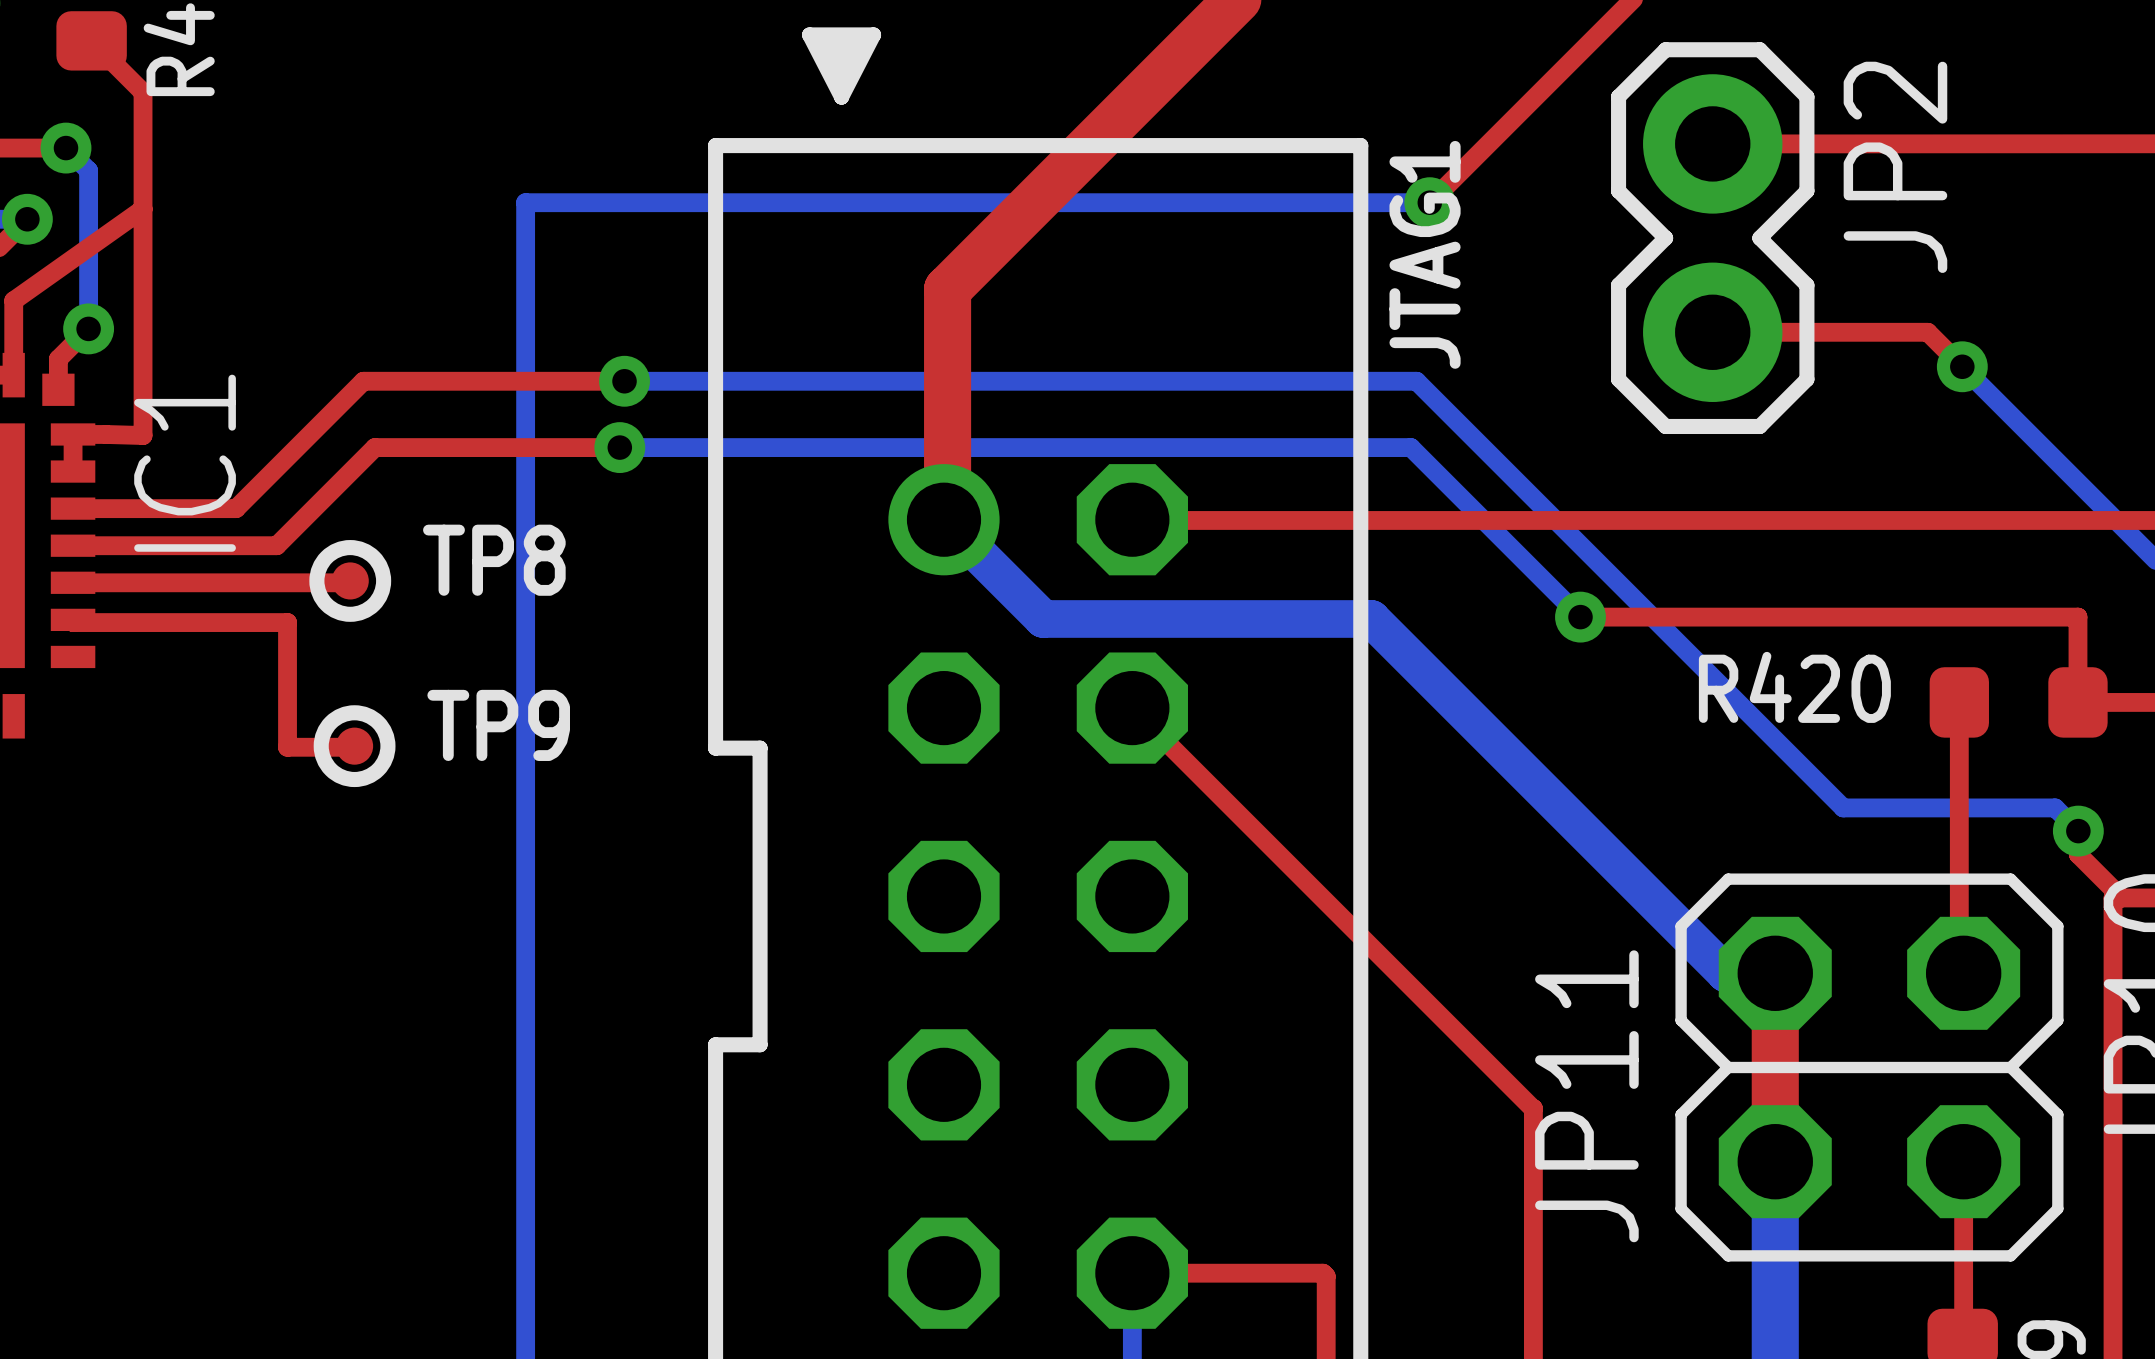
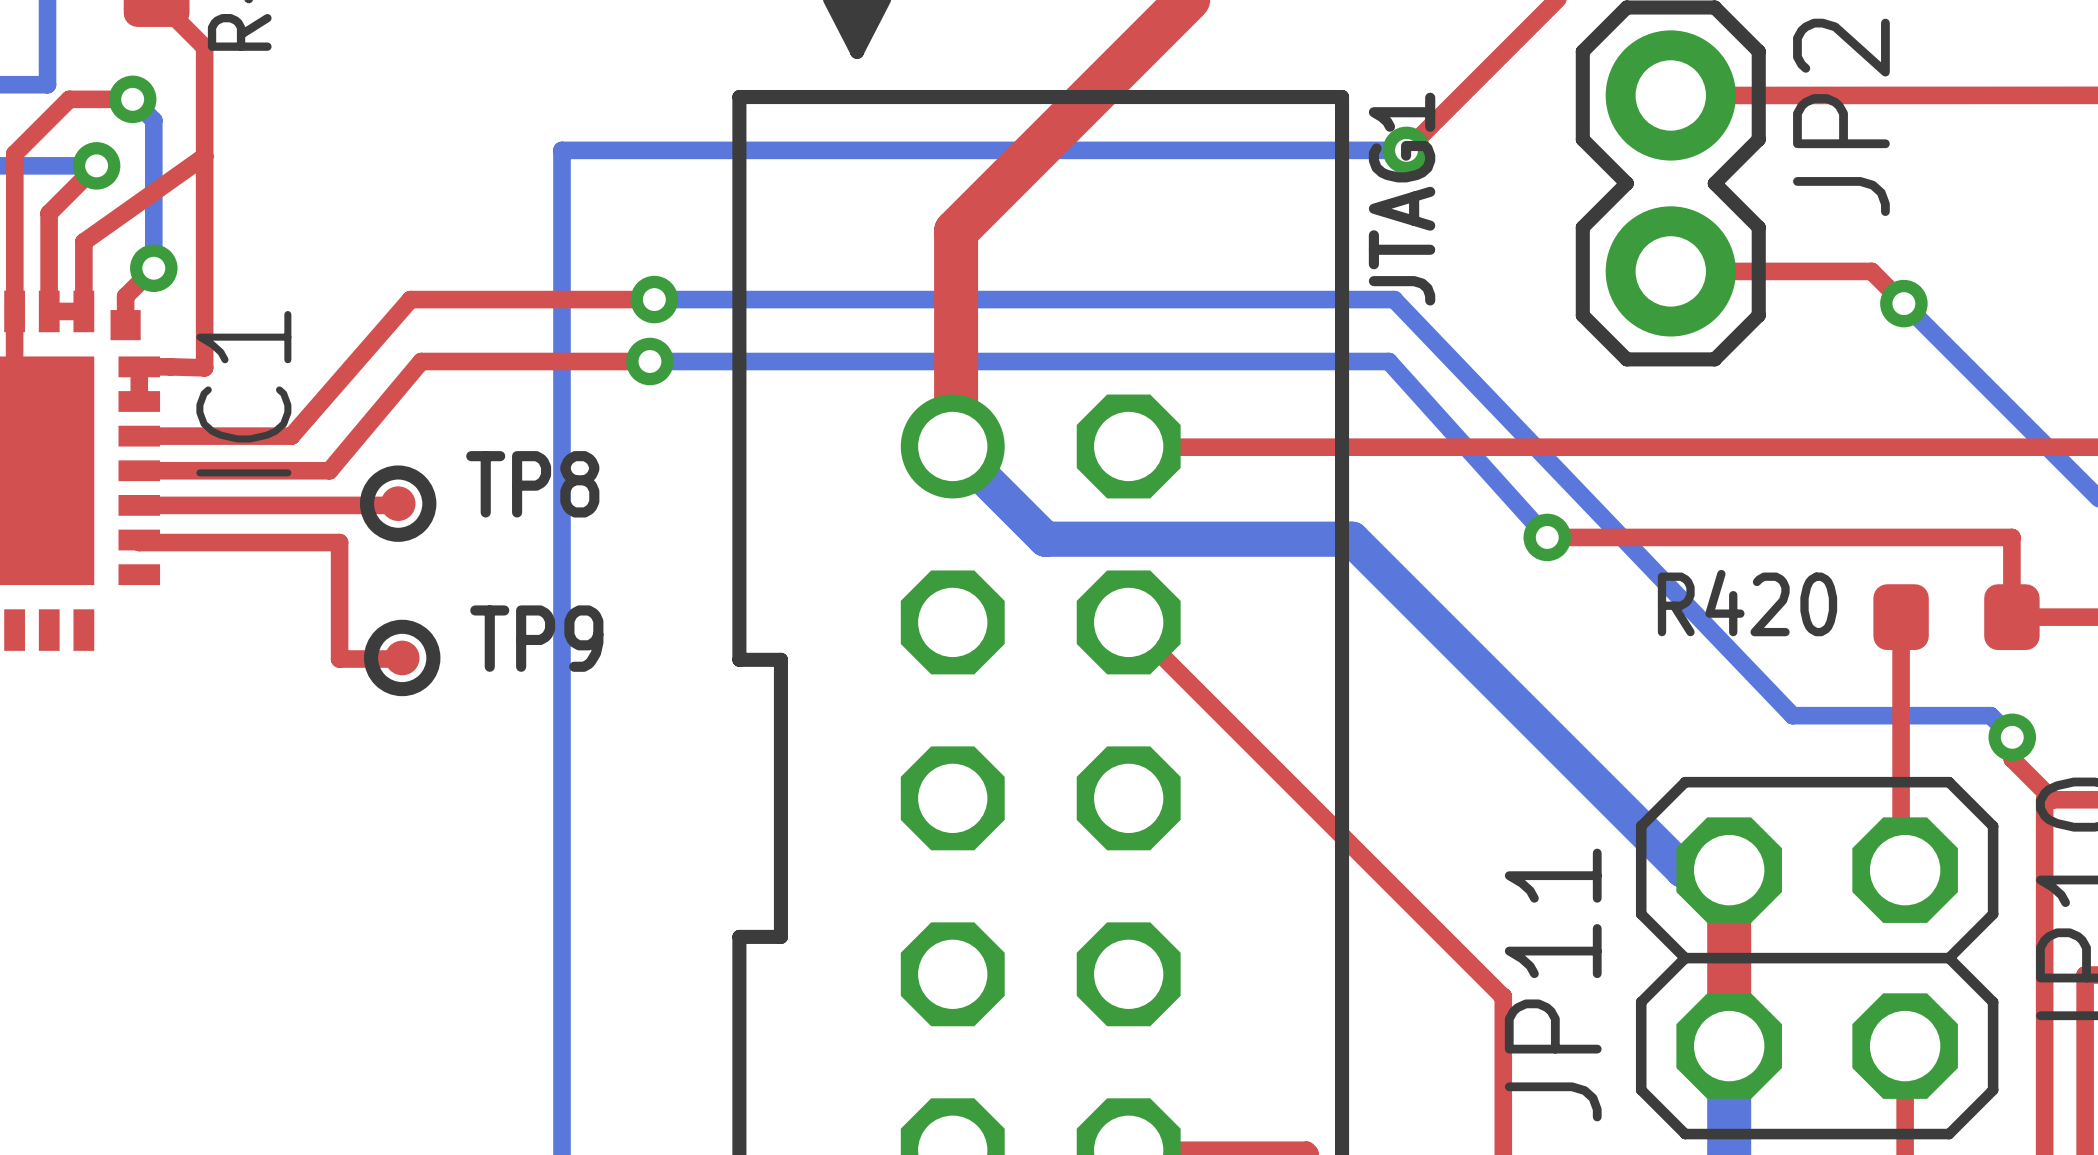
top track: (624, 381) (363, 381) (236, 508) -> (654, 299) (410, 299) (291, 436)
bottom track: (624, 381) (1416, 381) (1843, 807) -> (654, 299) (1394, 299) (1792, 715)
via position: (624, 381) -> (654, 299)
top track: (619, 447) (374, 447) (276, 545) -> (649, 361) (421, 361) (329, 470)
bottom track: (619, 447) (1410, 447) (1580, 617) -> (649, 361) (1388, 361) (1547, 537)
via position: (619, 447) -> (649, 361)

